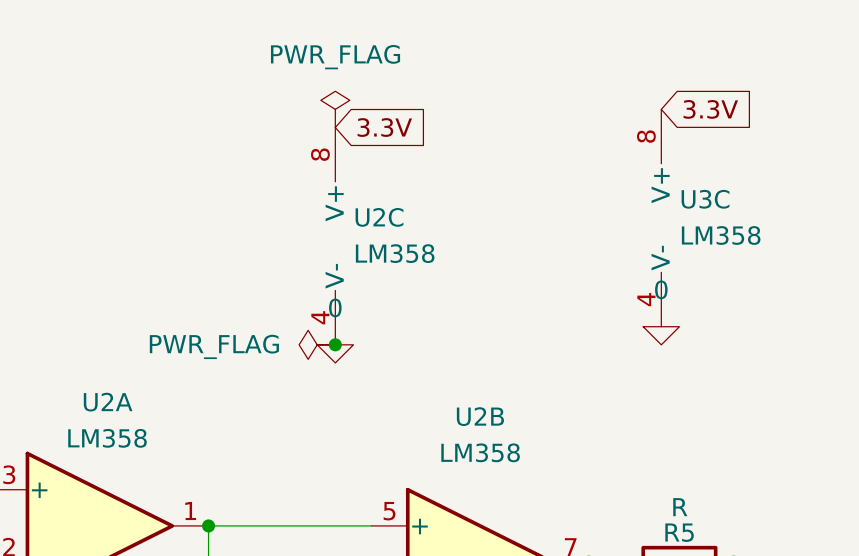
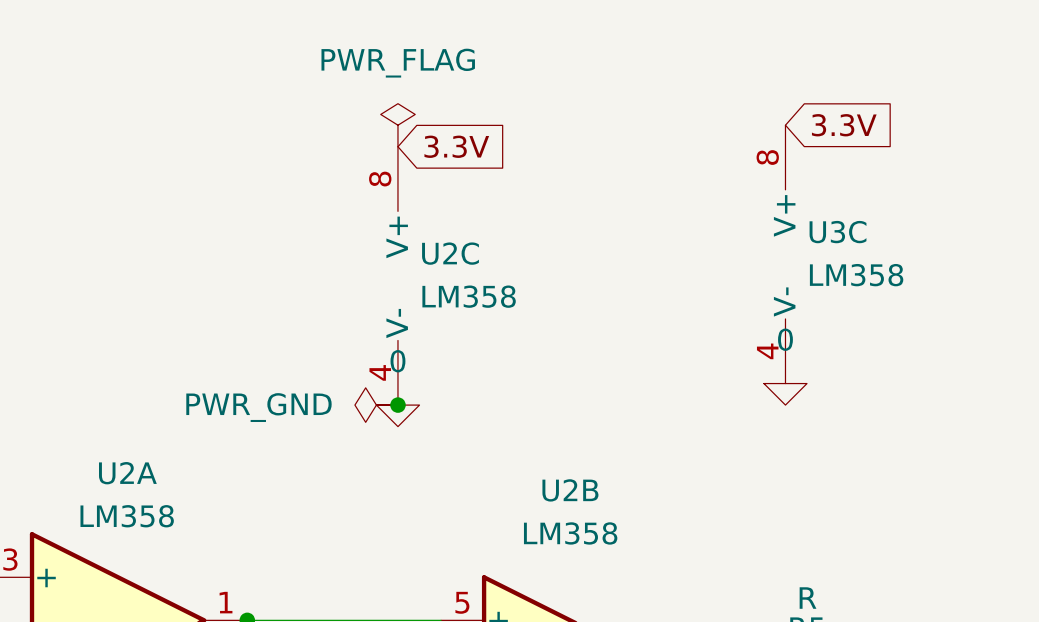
power symbol: PWR_FLAG (317, 344) -> PWR_GND (376, 405)

